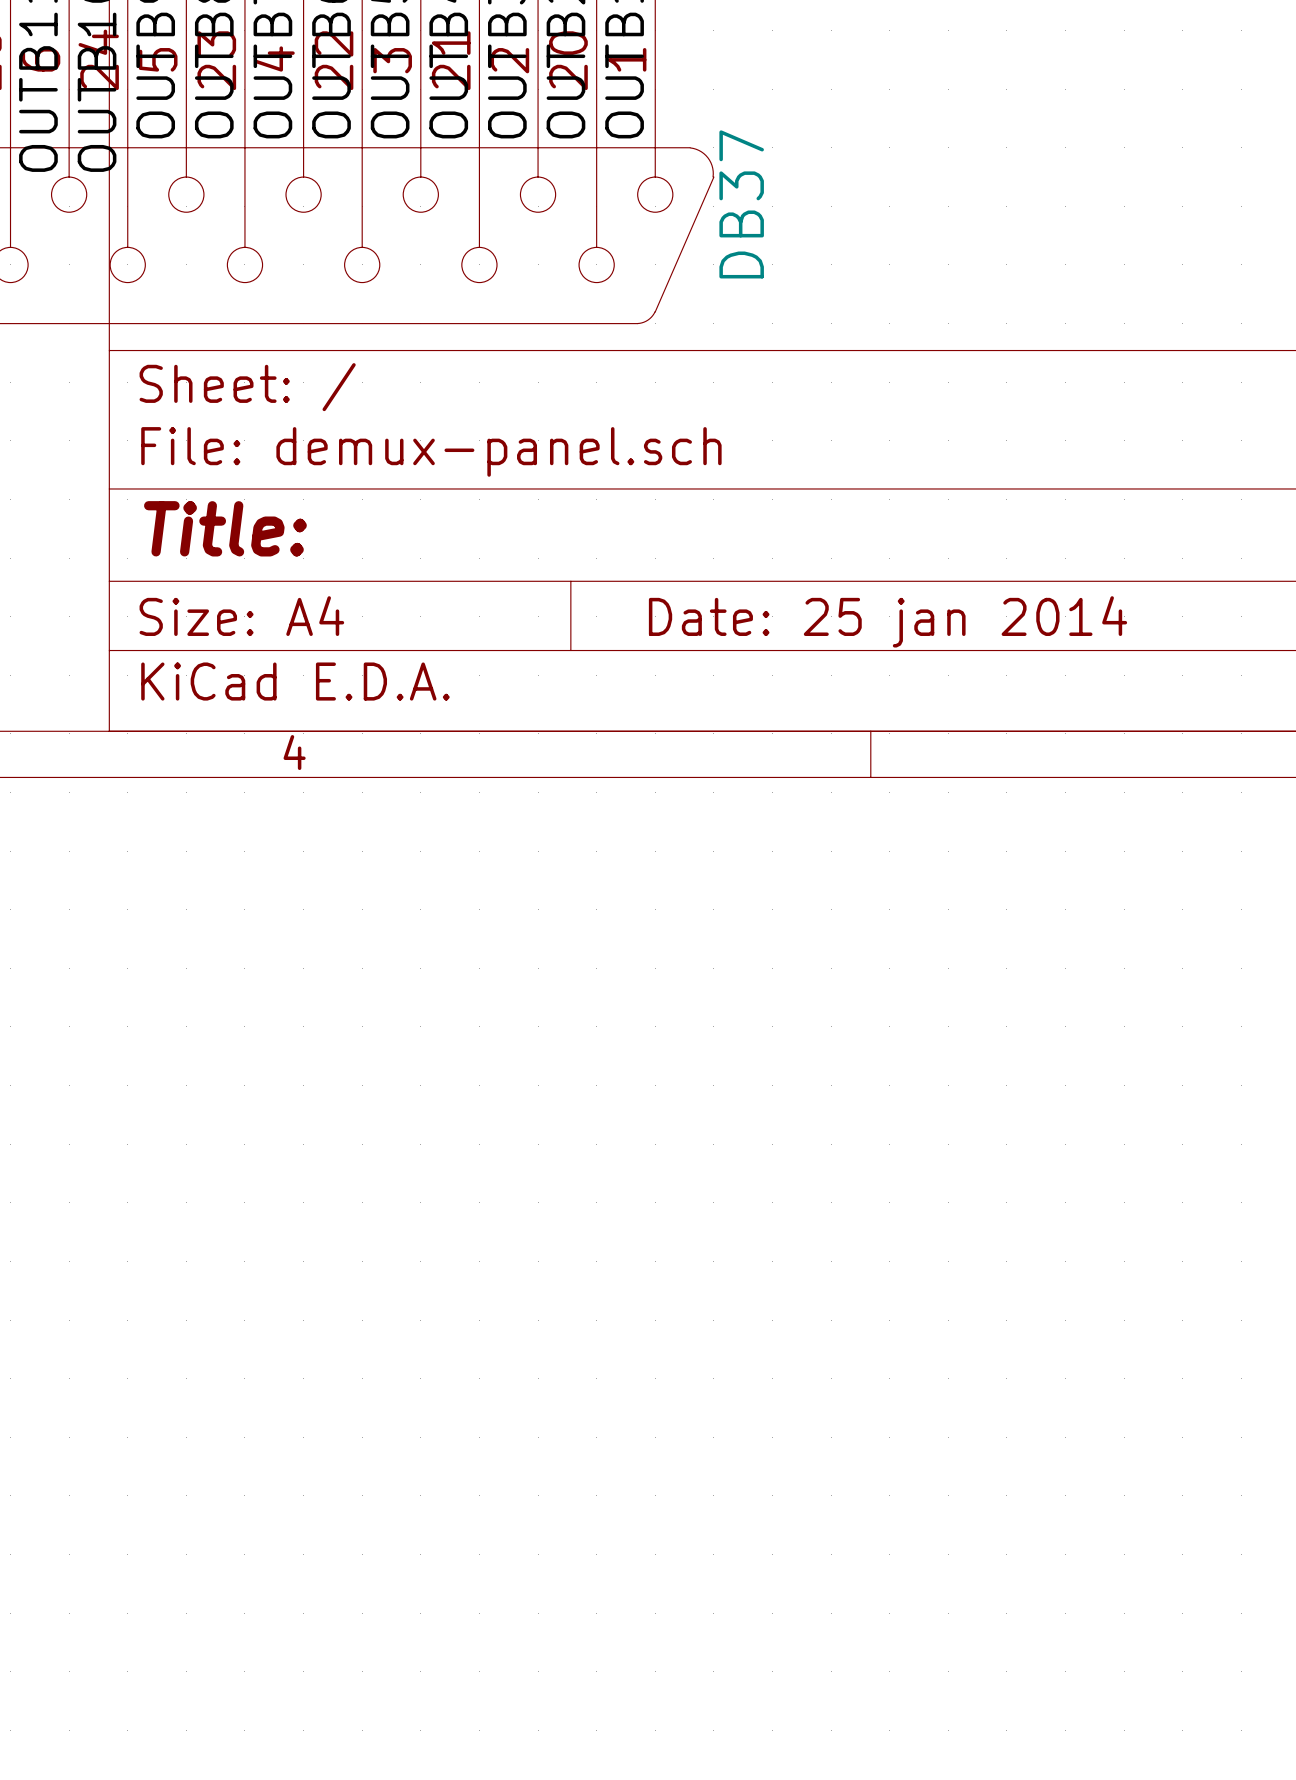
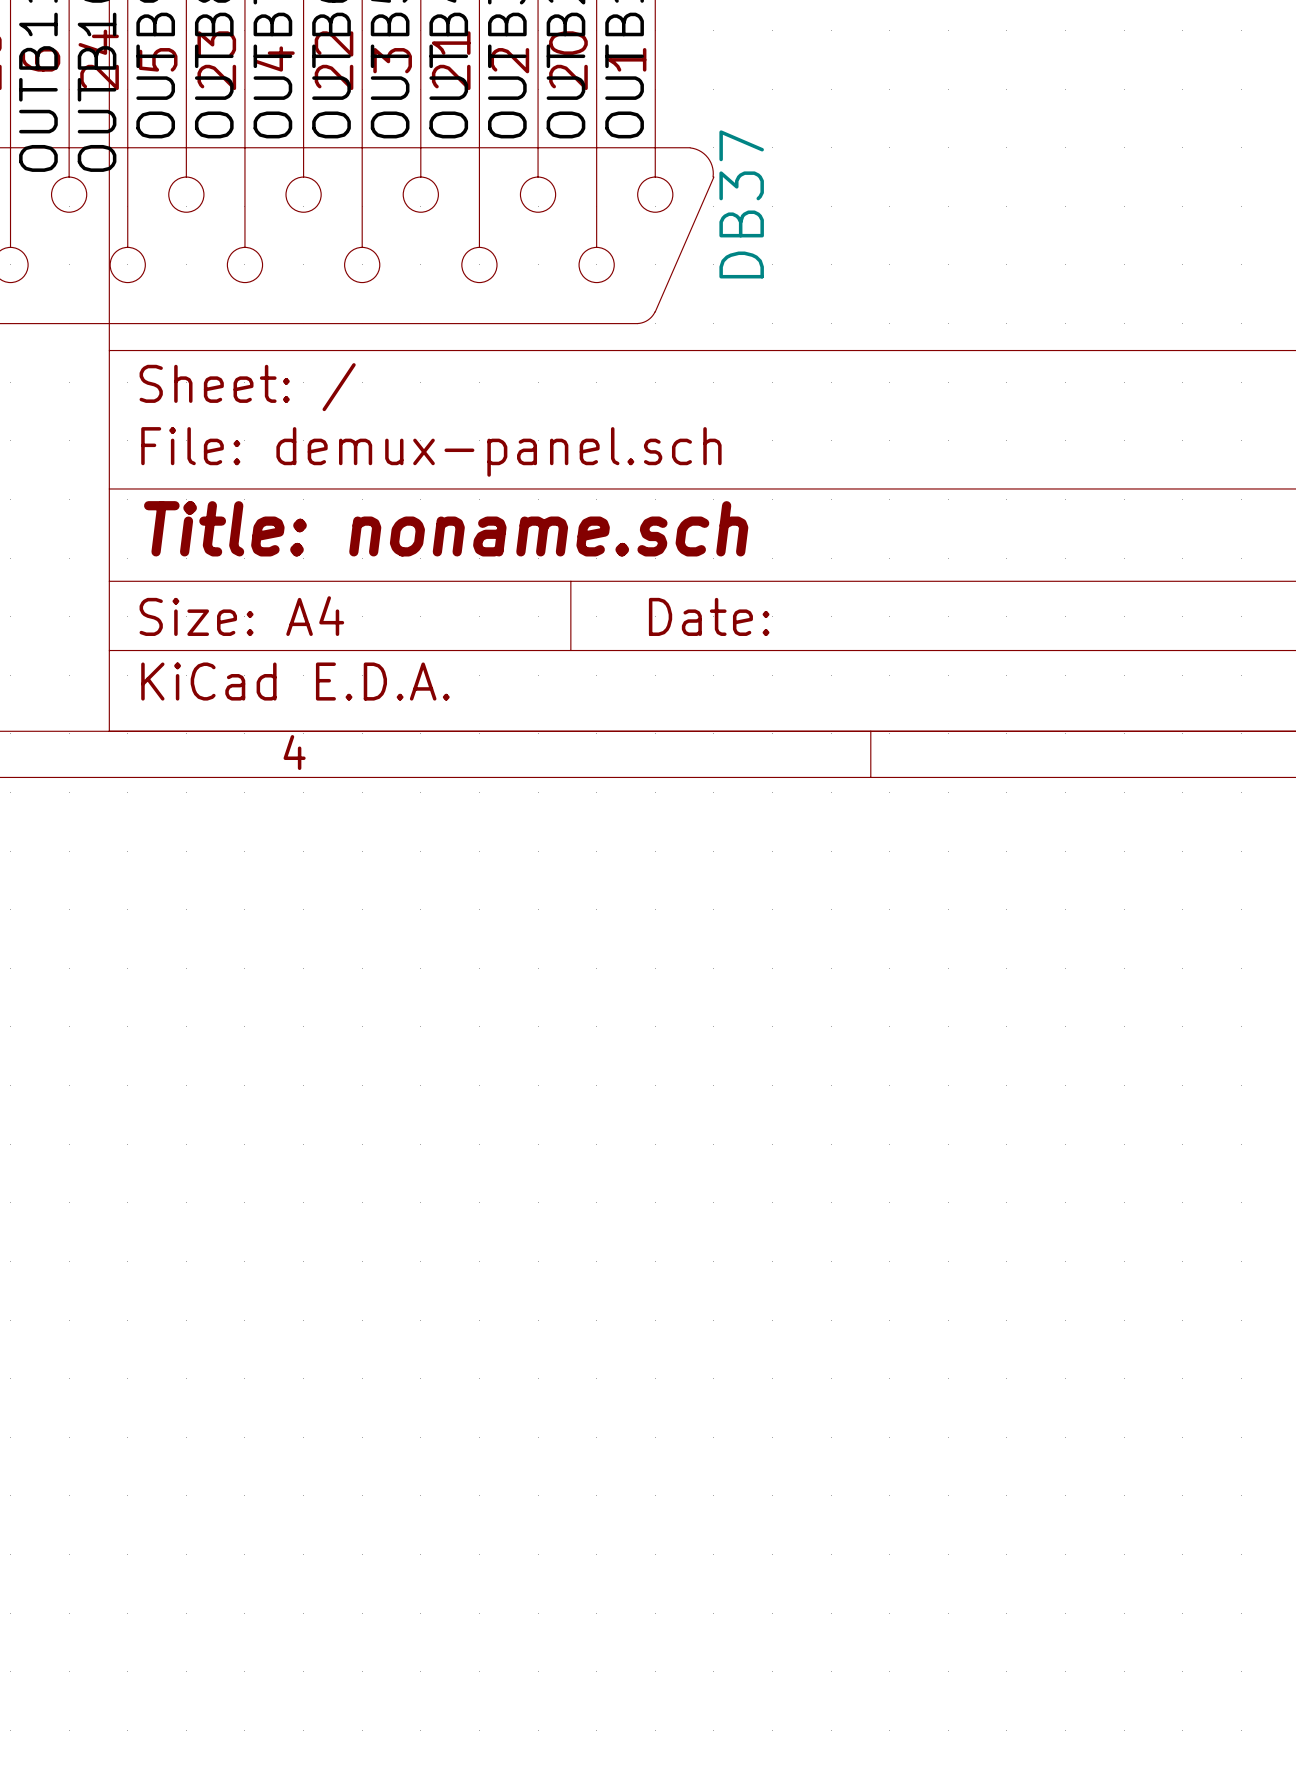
title block: Title: (225, 528) -> Title: noname.sch (446, 528)
title block: Date: 25 jan 2014 (887, 621) -> Date: (709, 616)

